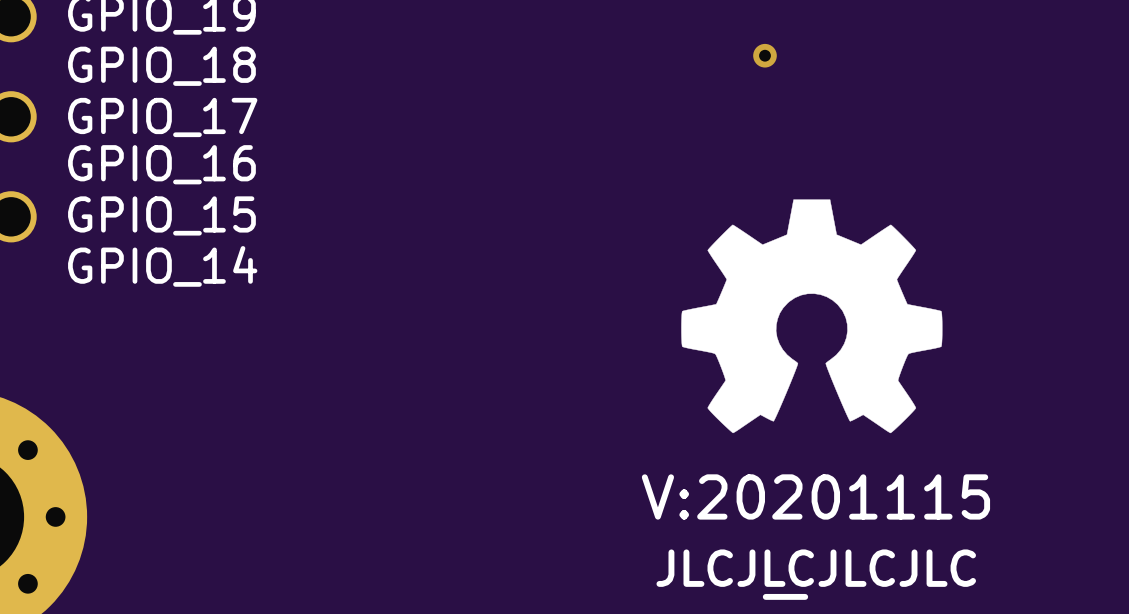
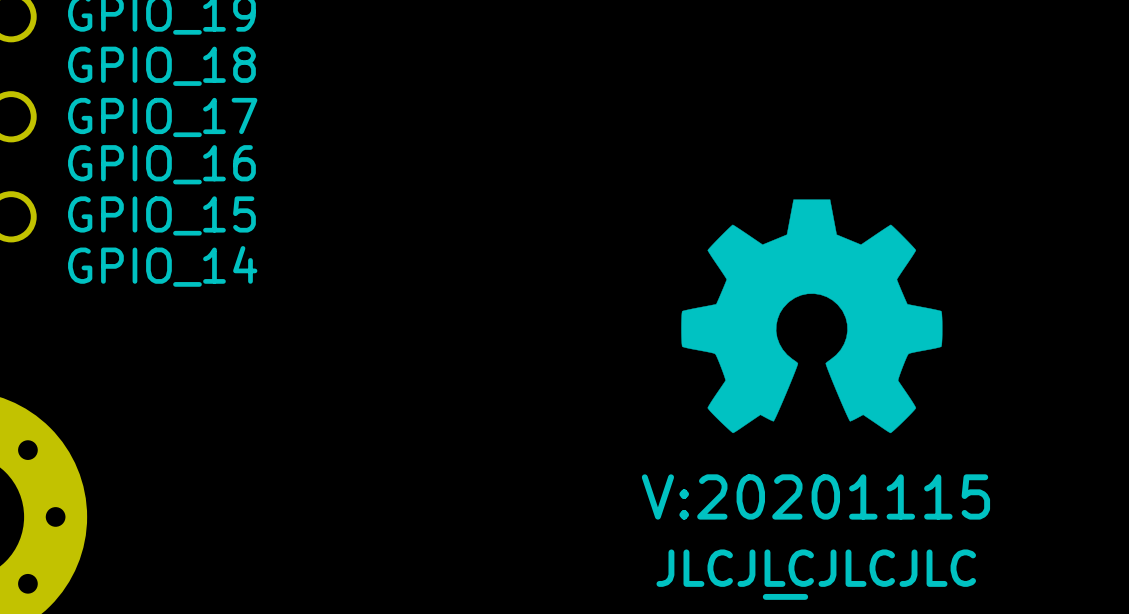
via: (765, 55) -> none

